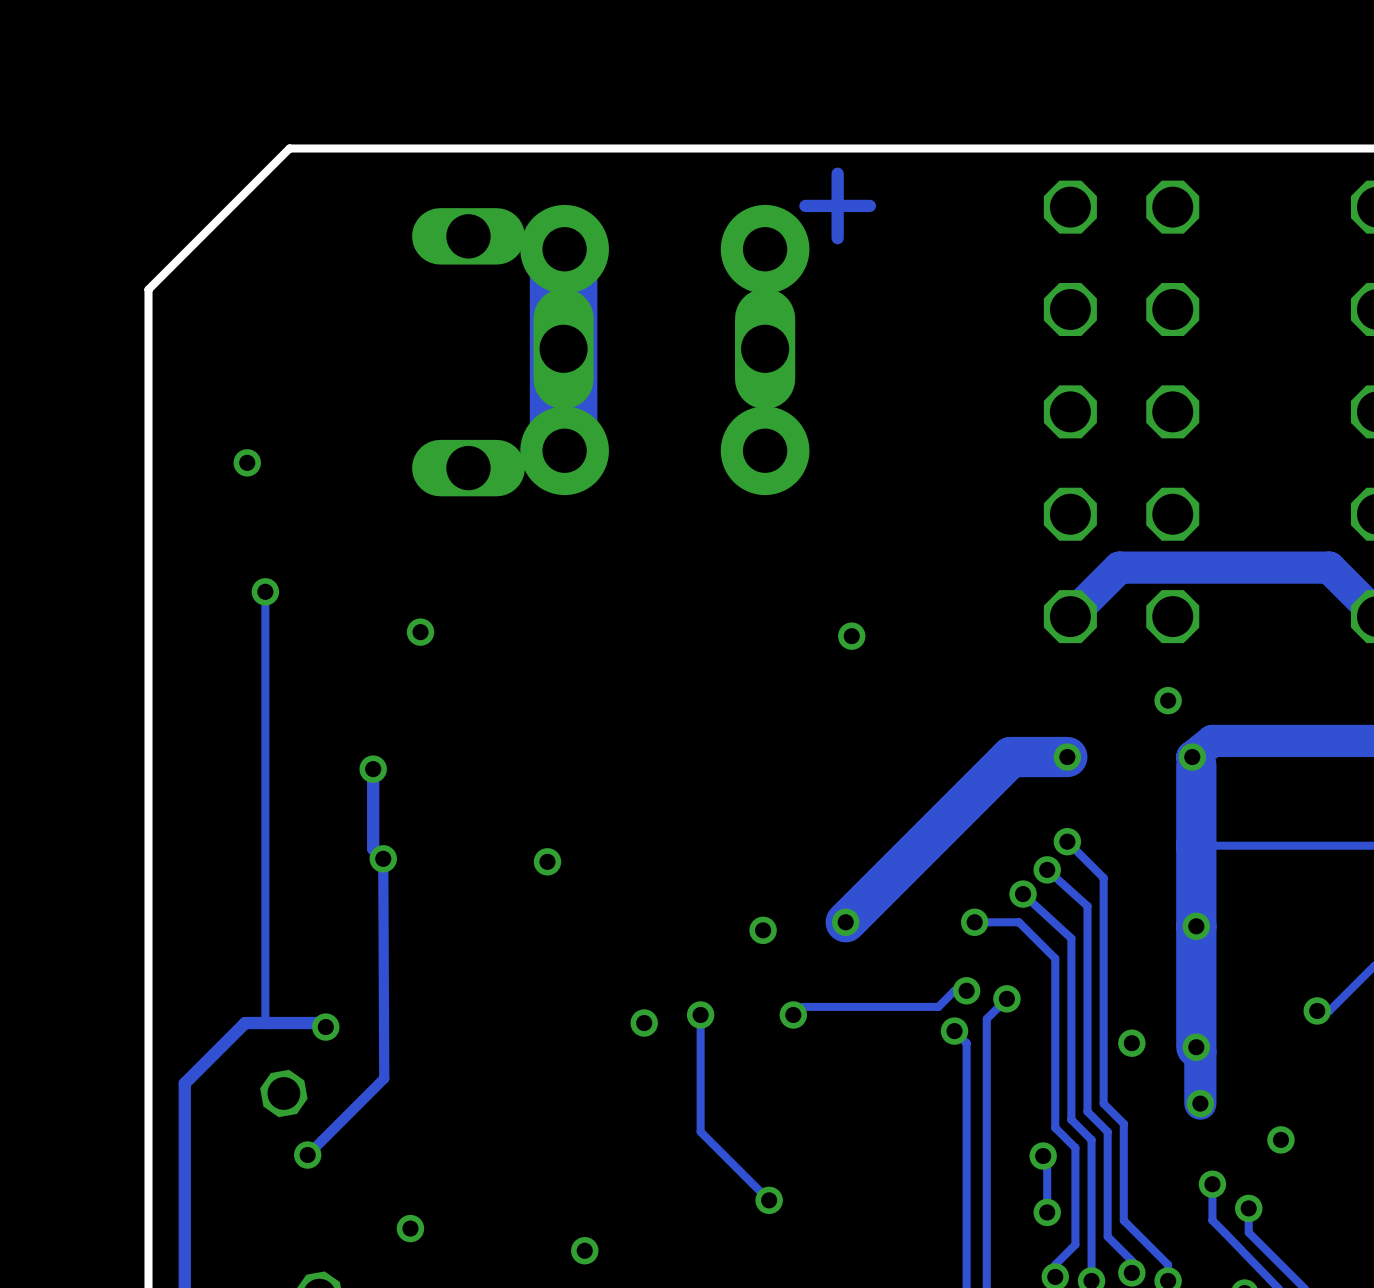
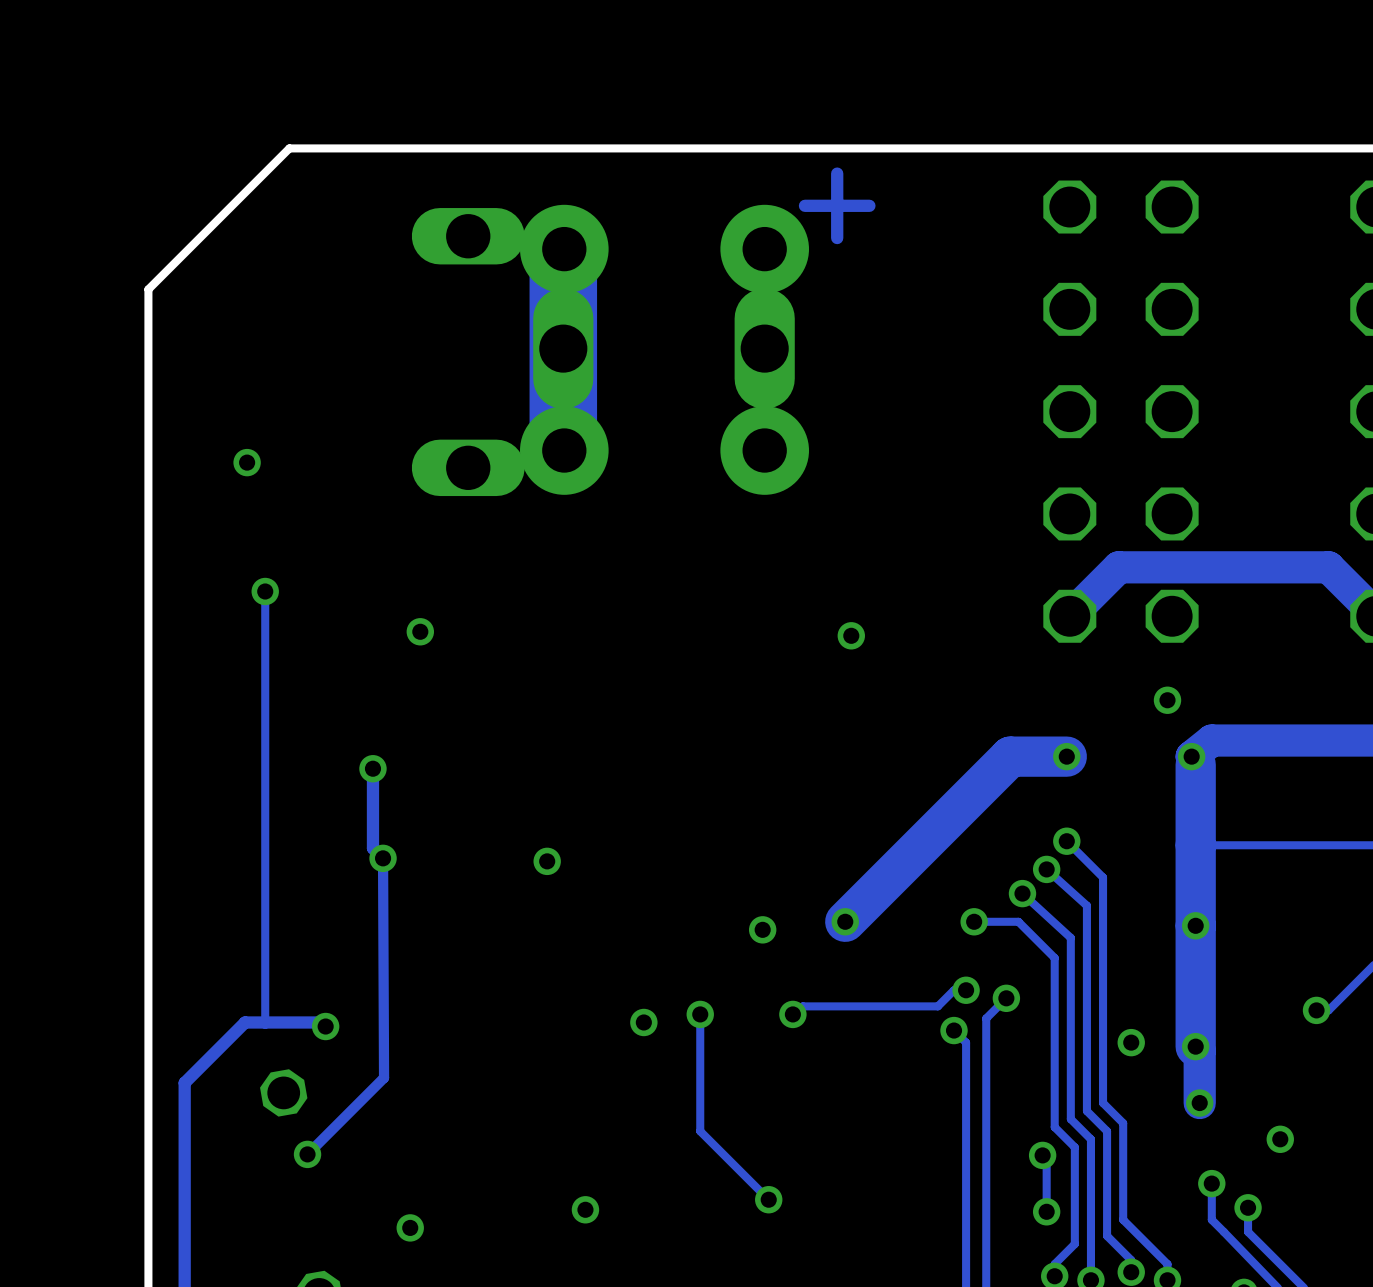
via position: (584, 1250) -> (585, 1209)

